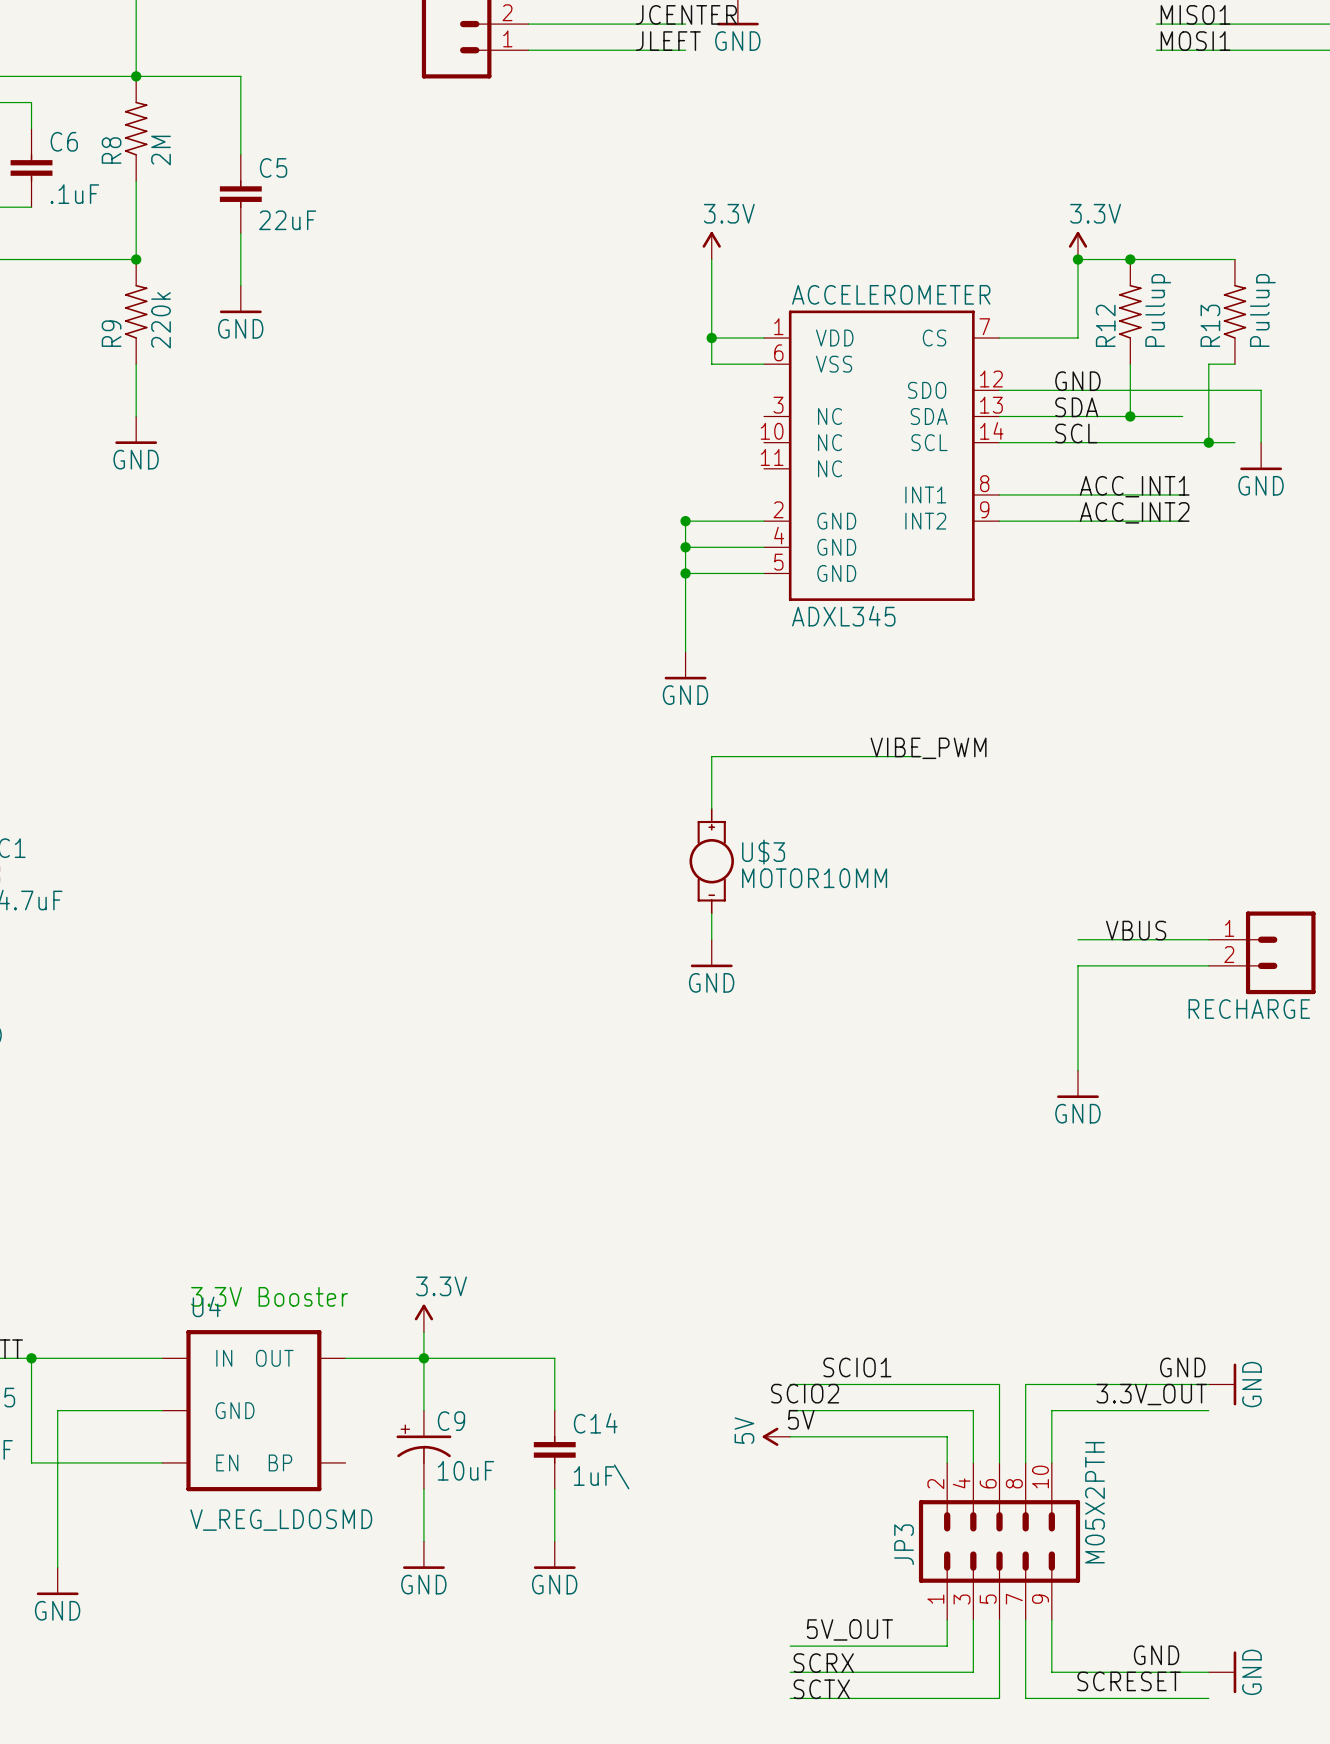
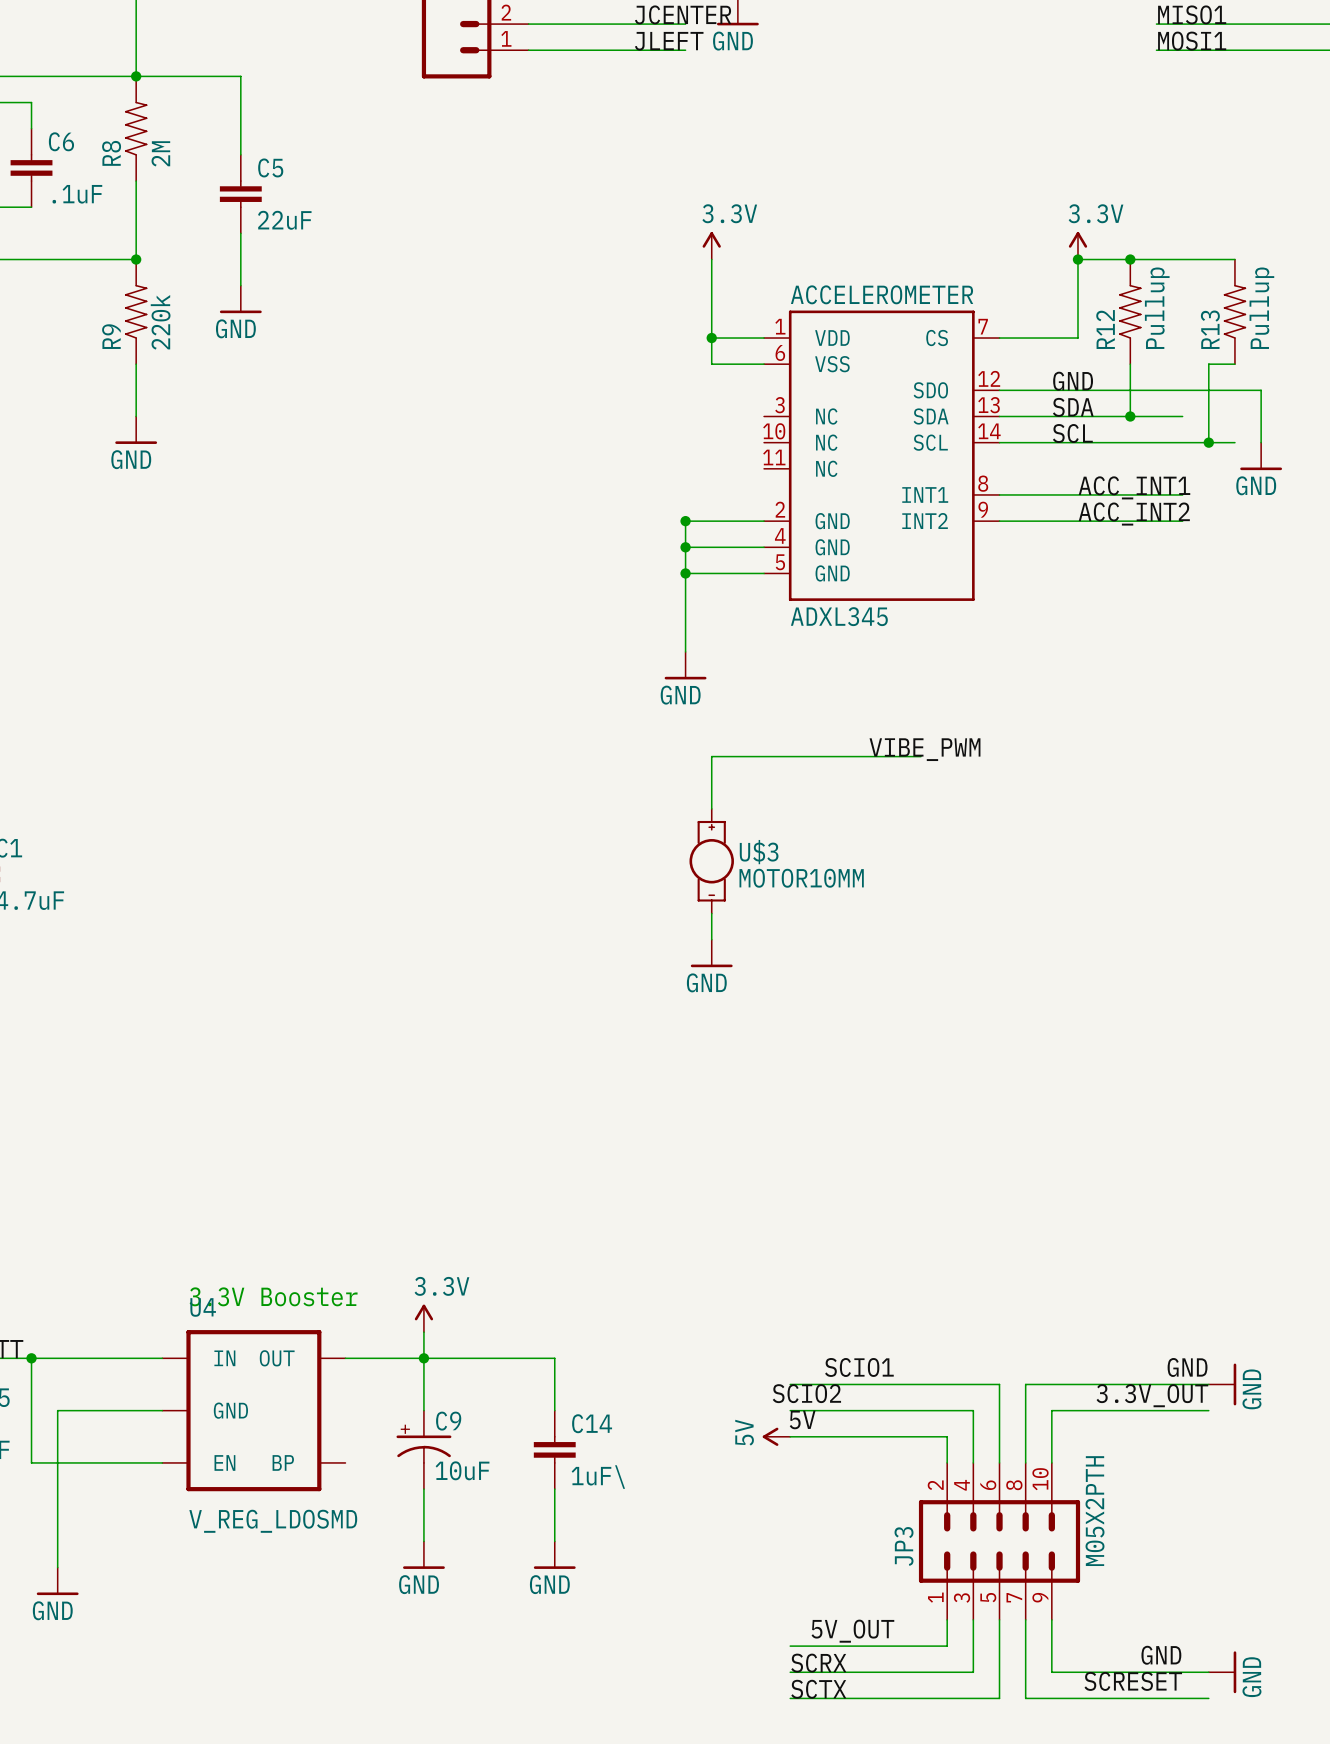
label: VBUS (1136, 930) -> none
wire: (1077, 939) (1208, 939) -> none
RECHARGE: (1262, 952) -> none
wire: (1208, 965) (1077, 965) (1077, 1070) -> none
power symbol: GND (1077, 1084) -> none

